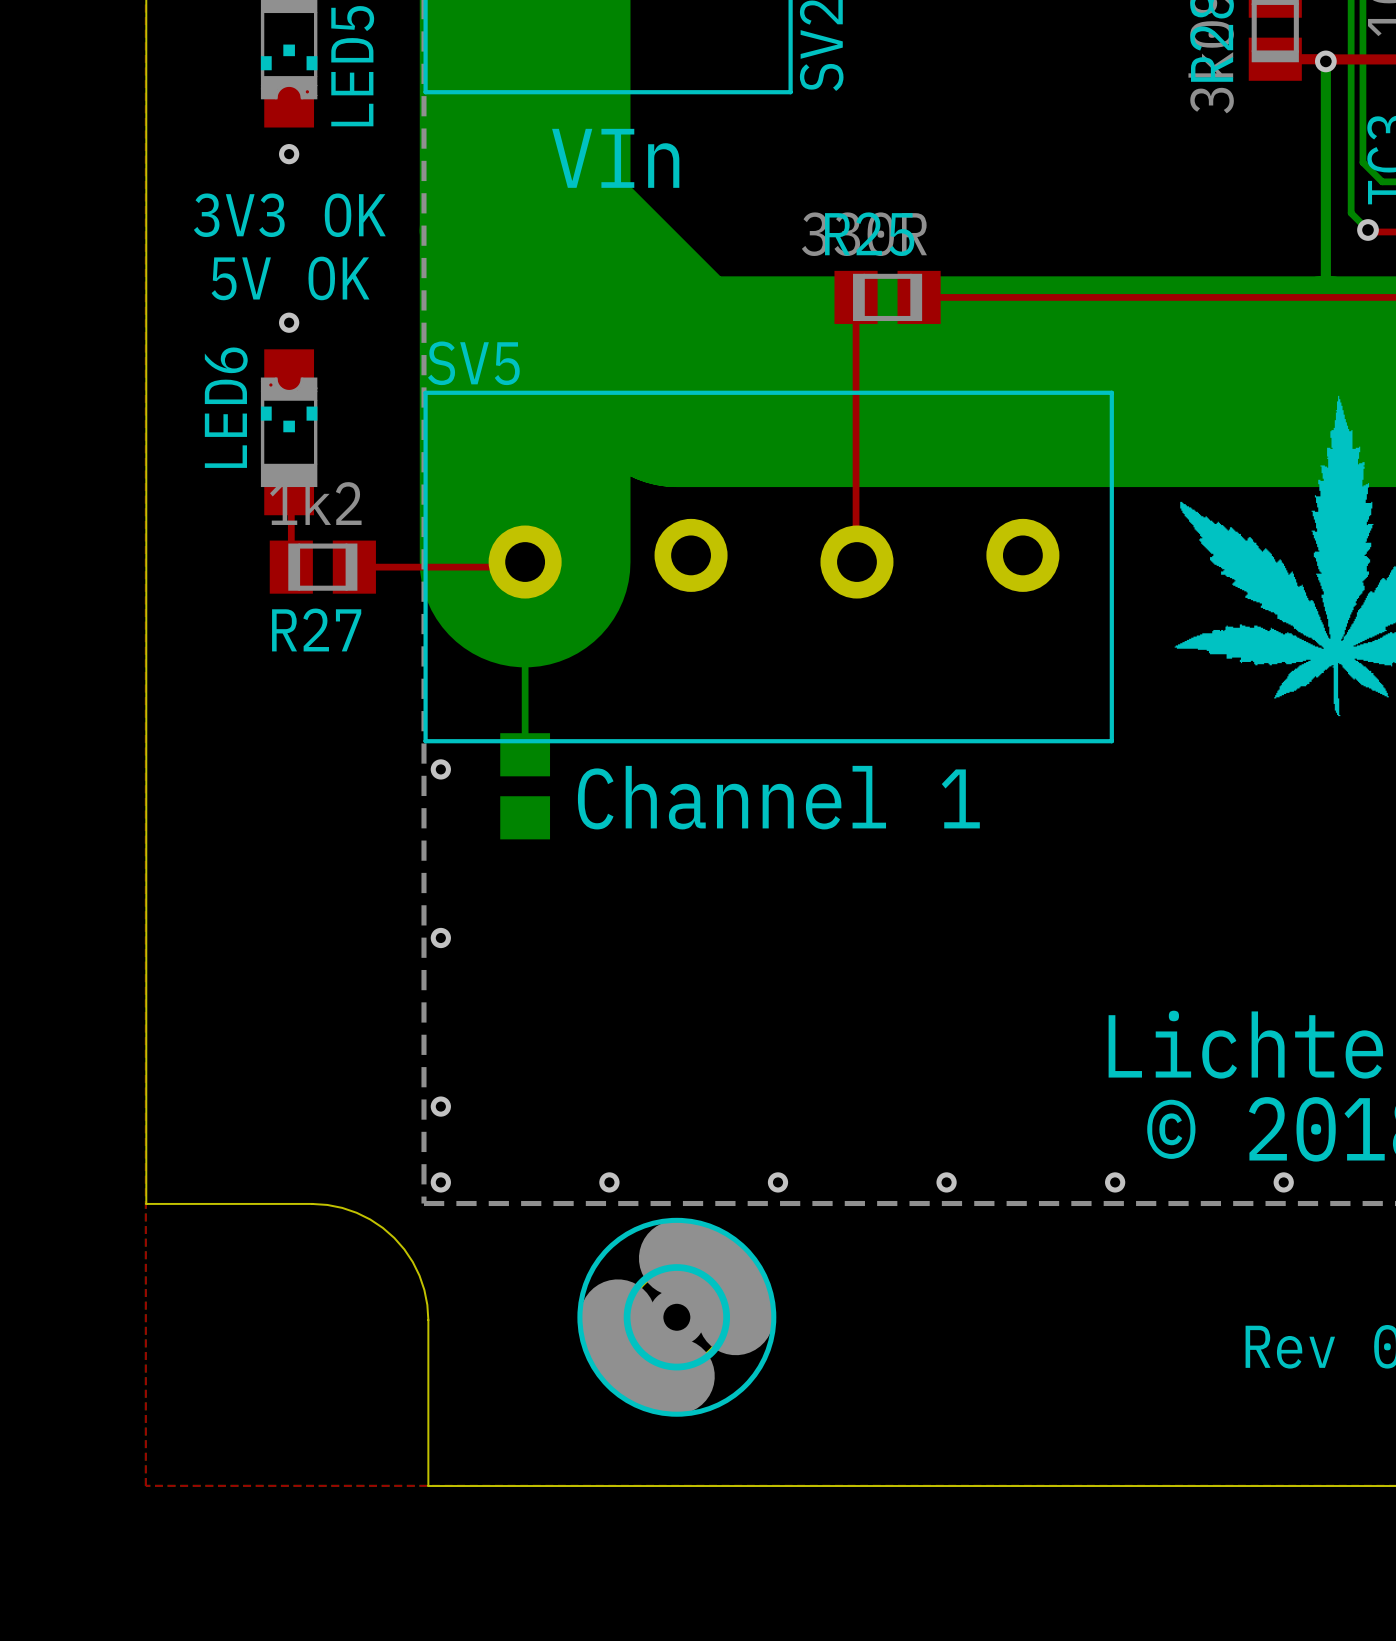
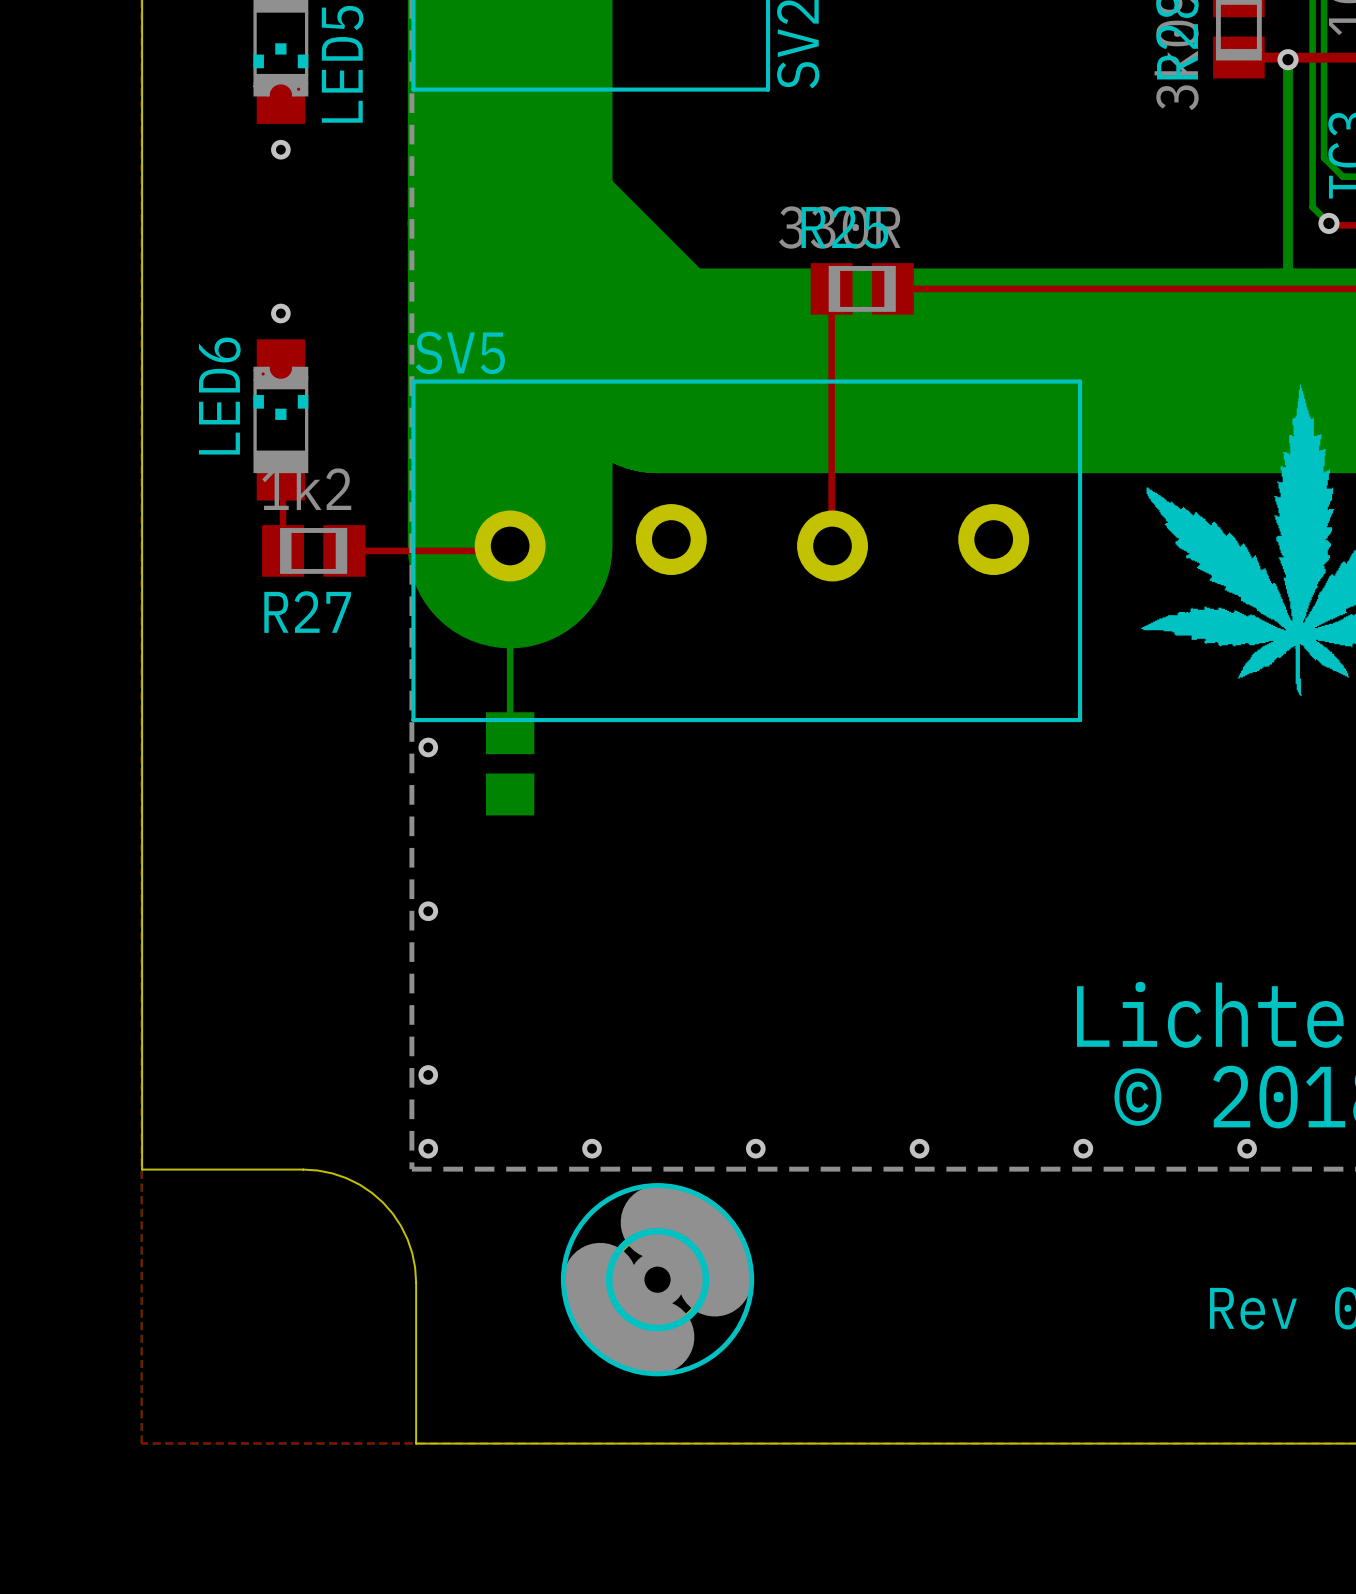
text: VIn (615, 158) -> none
text: 3V3 OK (289, 215) -> none
text: 5V OK (290, 278) -> none
text: Channel 1 (778, 797) -> none

